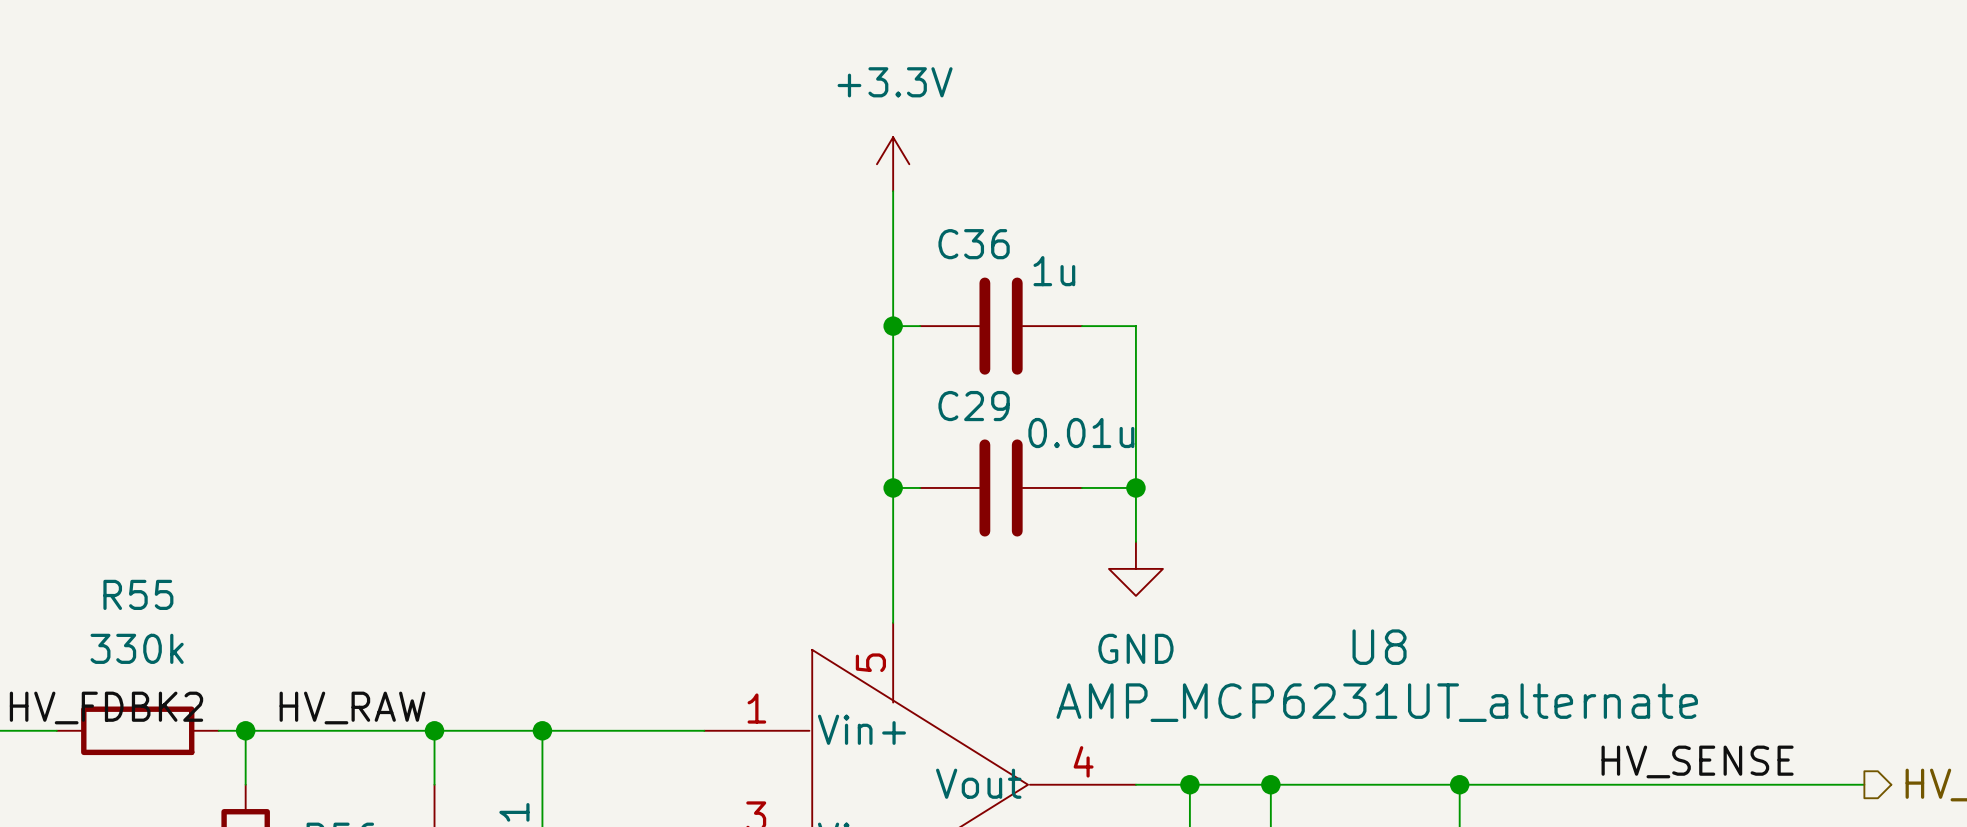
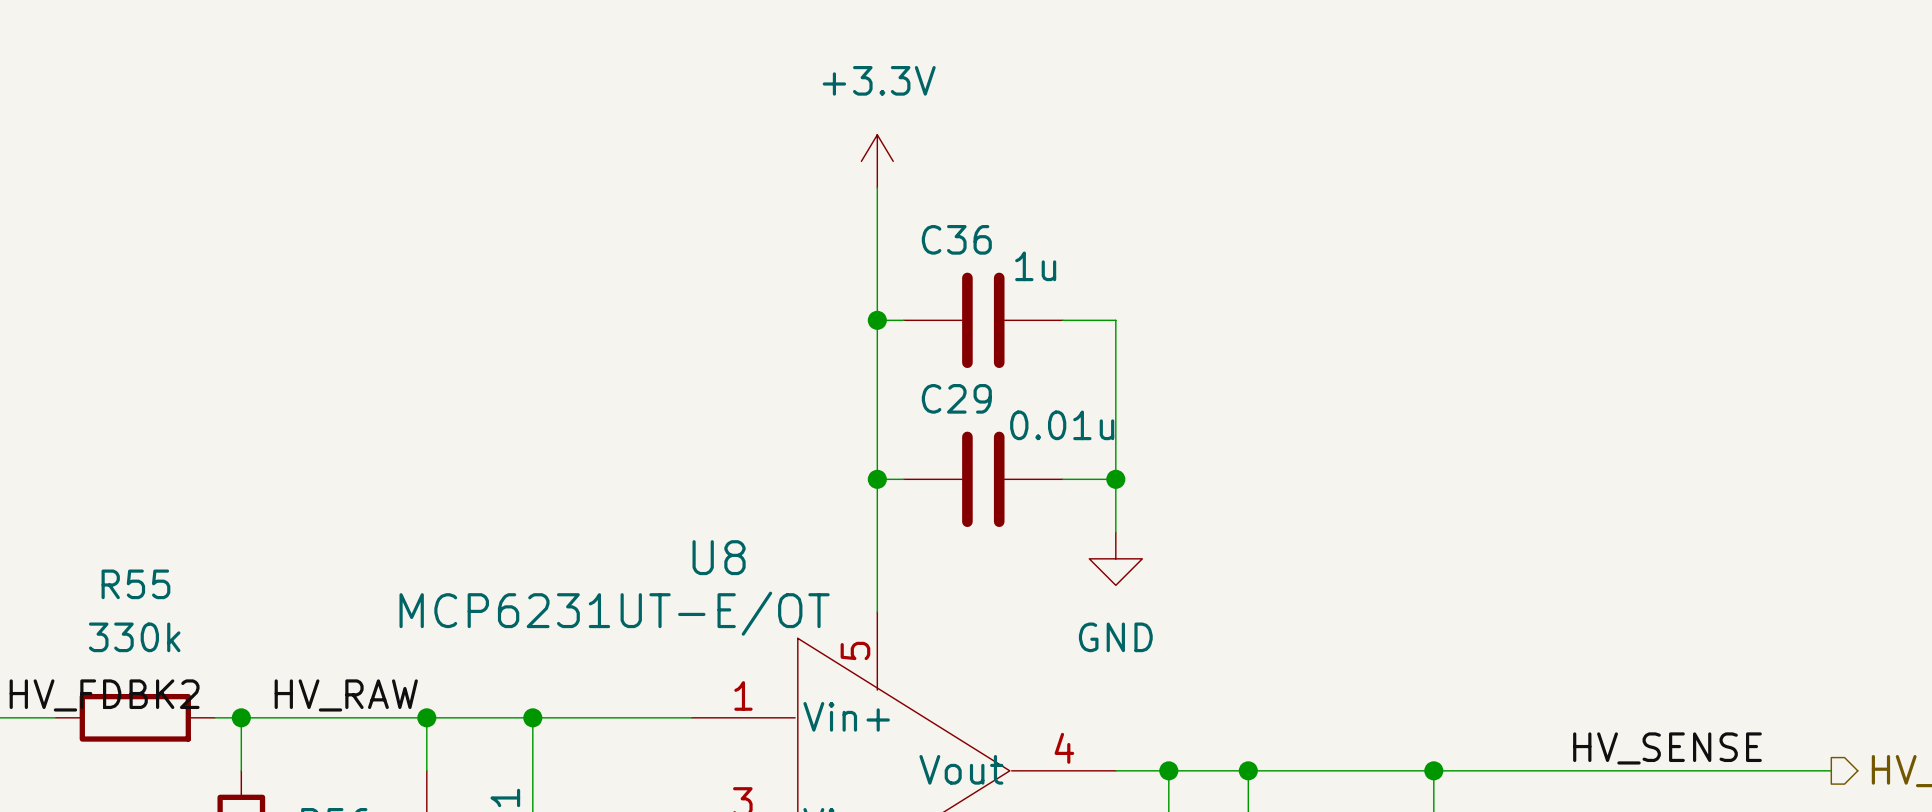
U8 name position: U8 (1379, 647) -> U8 (719, 557)
U8 value: AMP_MCP6231UT_alternate (1377, 702) -> MCP6231UT-E/OT (614, 613)

